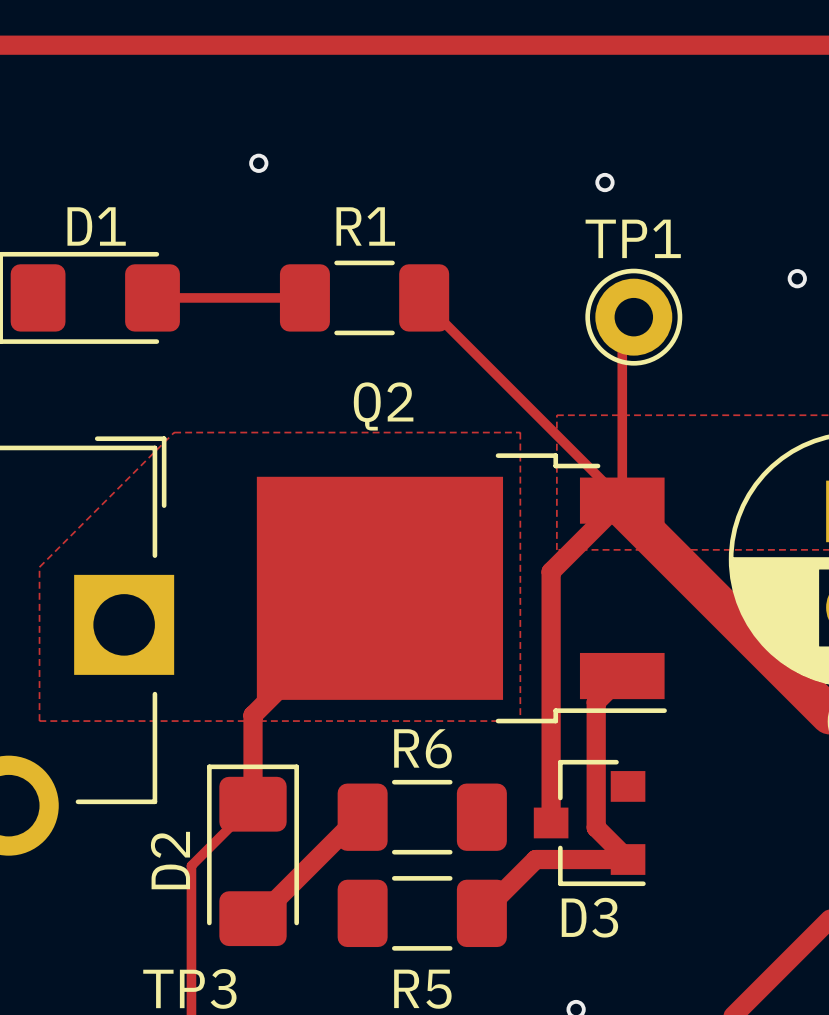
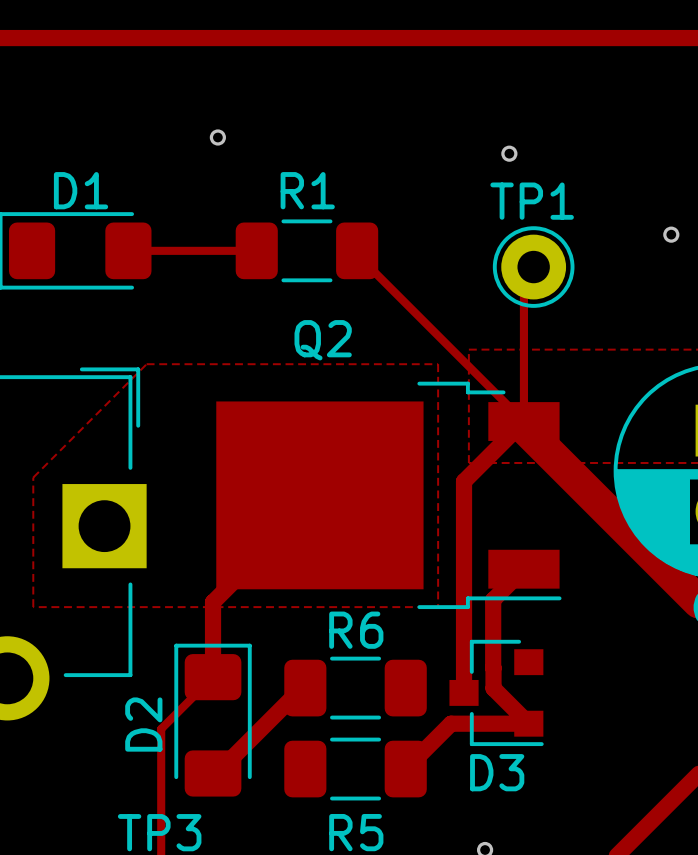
top track: (596, 702) (596, 827) -> (501, 591) (493, 599) (493, 667)
top track: none -> (493, 668) (493, 688) (501, 696)

